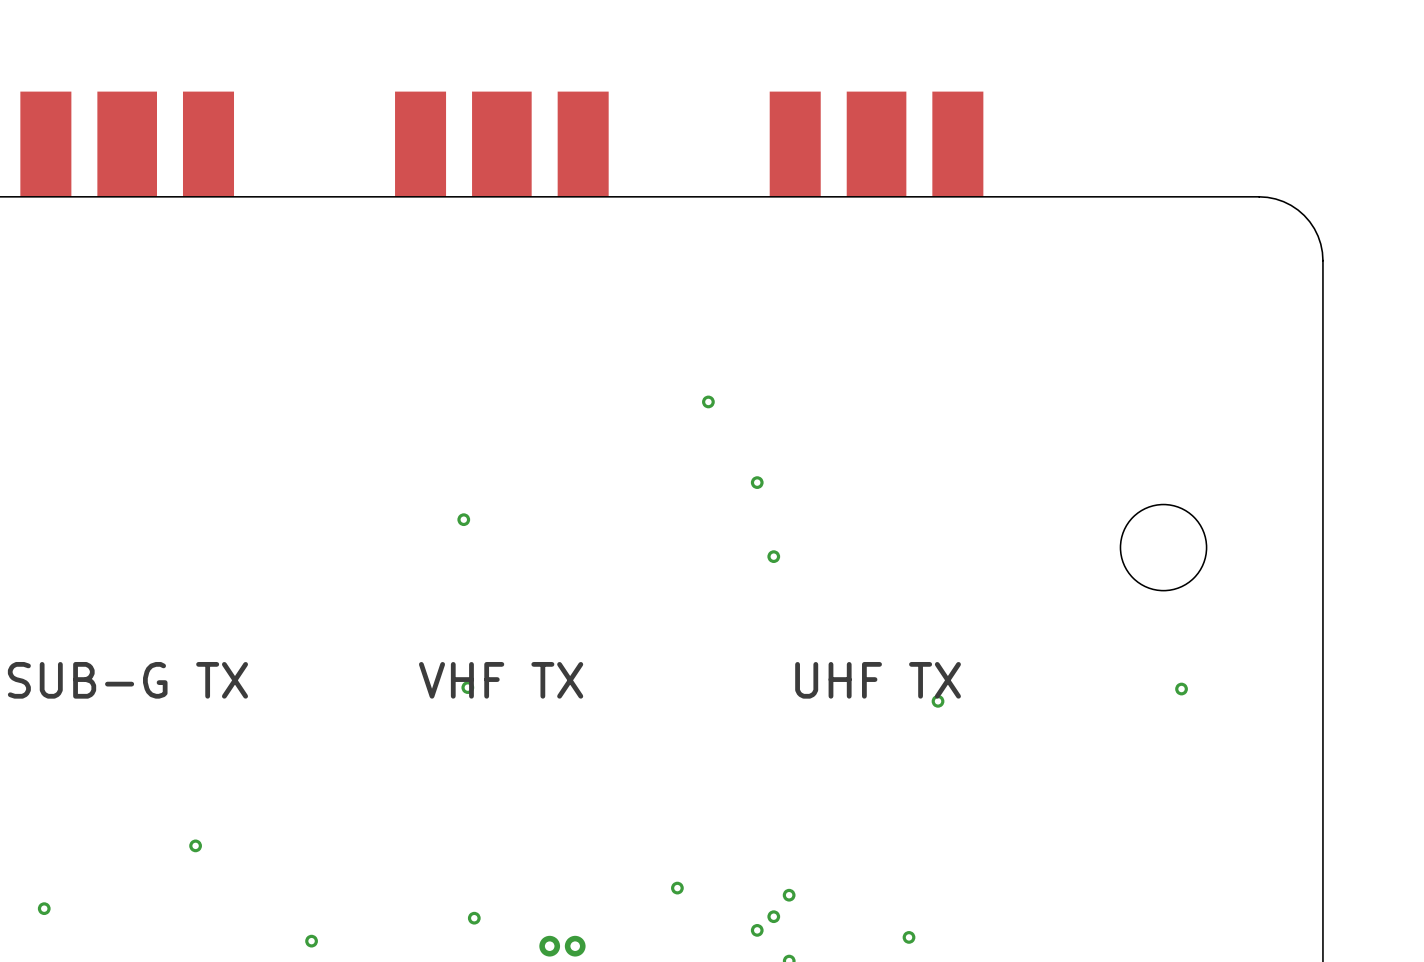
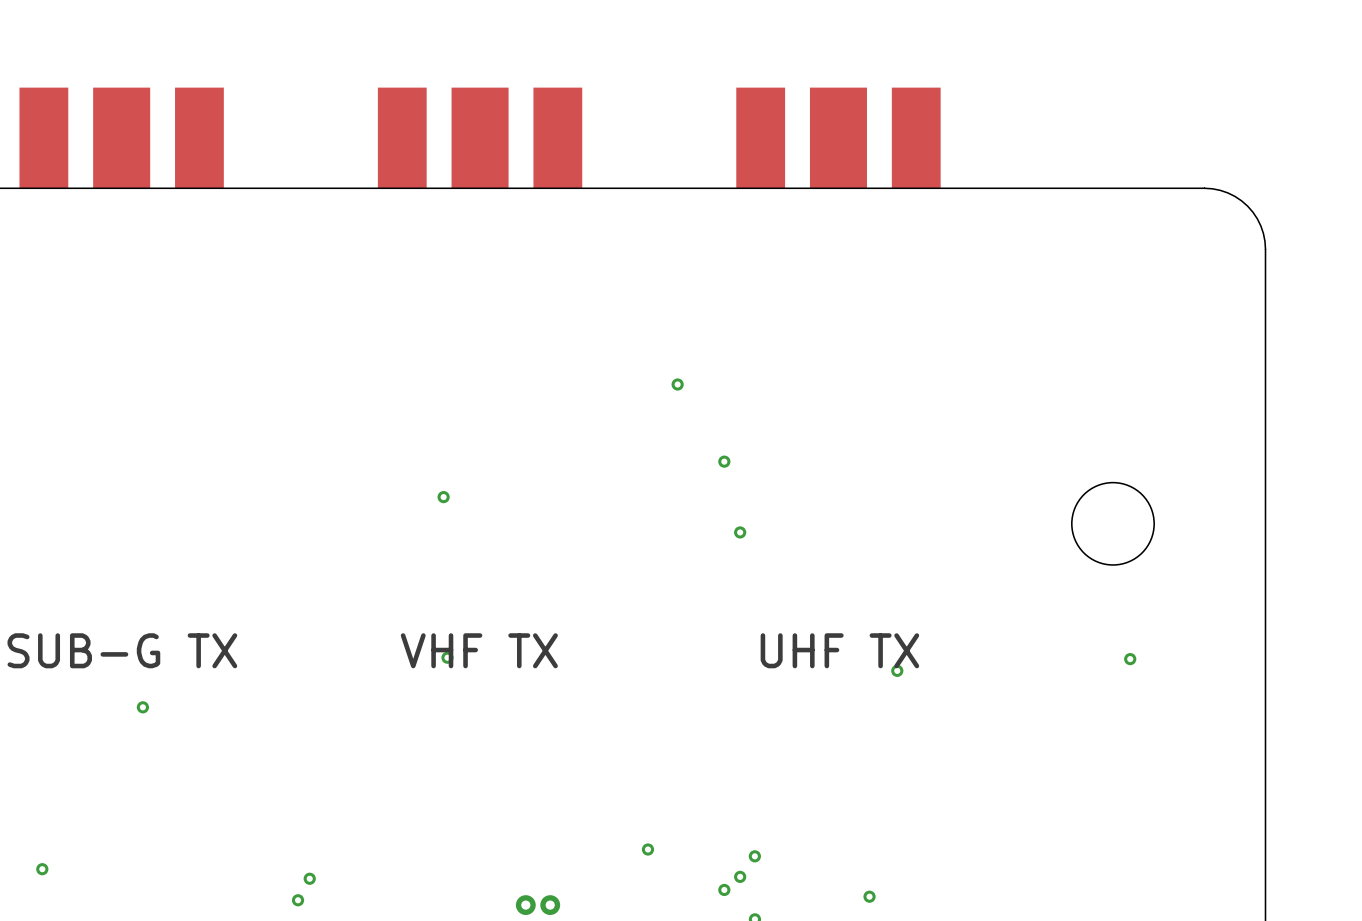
via: none -> (142, 707)
via: (195, 845) -> none
via: none -> (309, 878)
via: (474, 918) -> none

